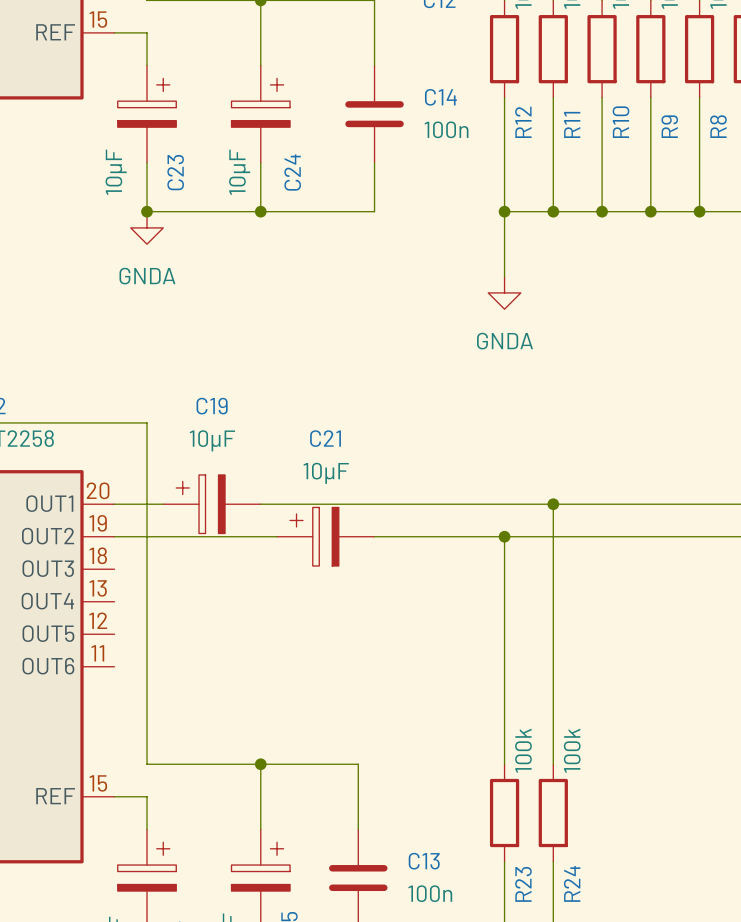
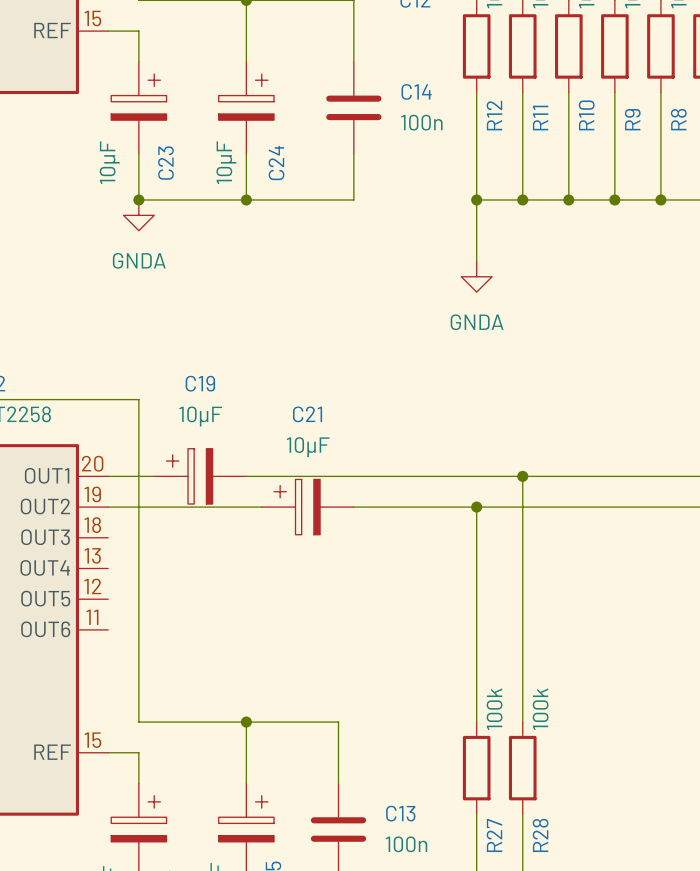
R24 name: R24 (572, 883) -> R28 (540, 835)
R23 name: R23 (523, 884) -> R27 (494, 835)

